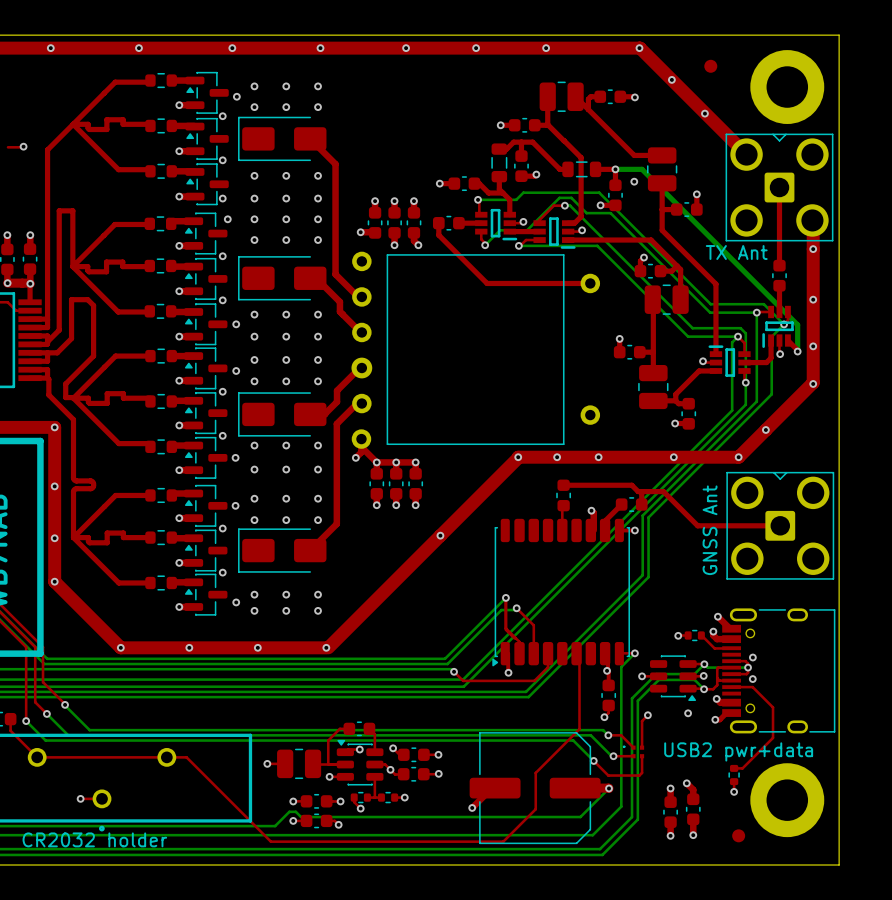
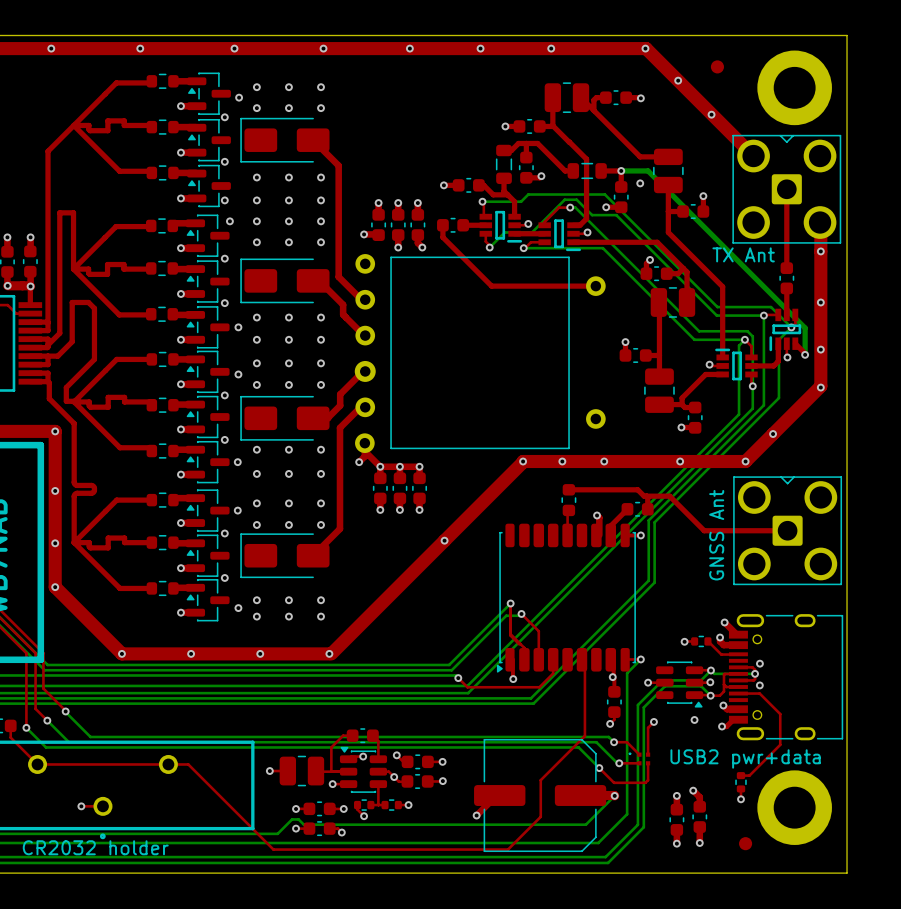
top track: (23, 146) (8, 147) -> none
via: (23, 146) -> none

